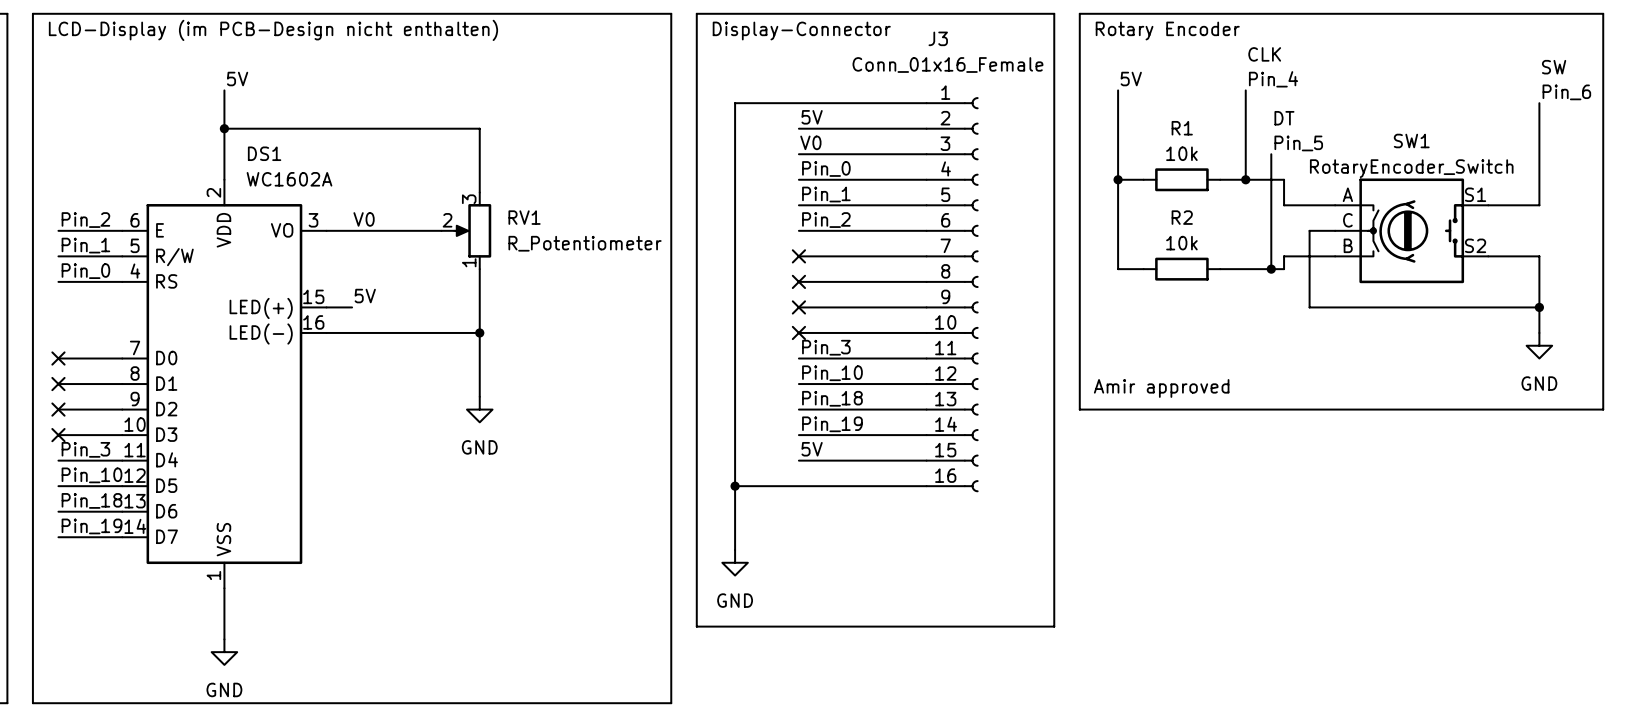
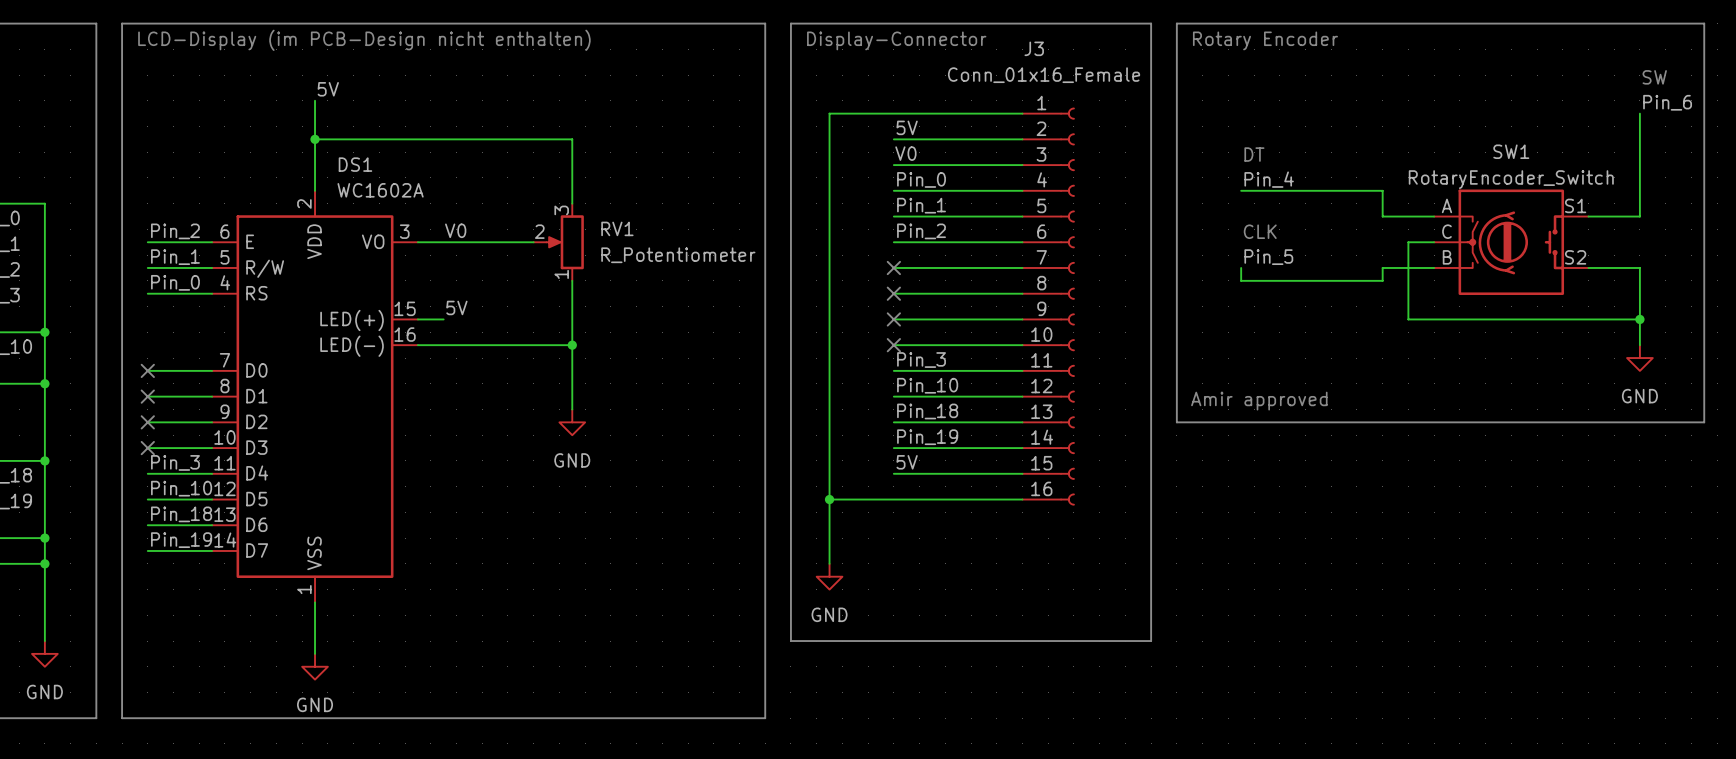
text position: CLK (1264, 54) -> CLK (1260, 231)
label: 5V (1131, 79) -> none
label position: Pin_4 (1273, 79) -> Pin_4 (1269, 179)
wire: (1118, 90) (1118, 269) (1143, 269) -> none
wire: (1245, 90) (1245, 179) -> none
text position: DT (1284, 118) -> DT (1254, 154)
label position: Pin_5 (1298, 143) -> Pin_5 (1268, 257)
wire: (1271, 154) (1271, 269) -> none
wire: (1118, 179) (1143, 179) -> (1318, 190) (1241, 190)
junction: (1118, 179) -> none
R1: 10k (1181, 179) -> none
junction: (1245, 179) -> none
wire: none -> (1241, 267) (1241, 280) (1318, 280)
R2: 10k (1181, 269) -> none
junction: (1271, 269) -> none

